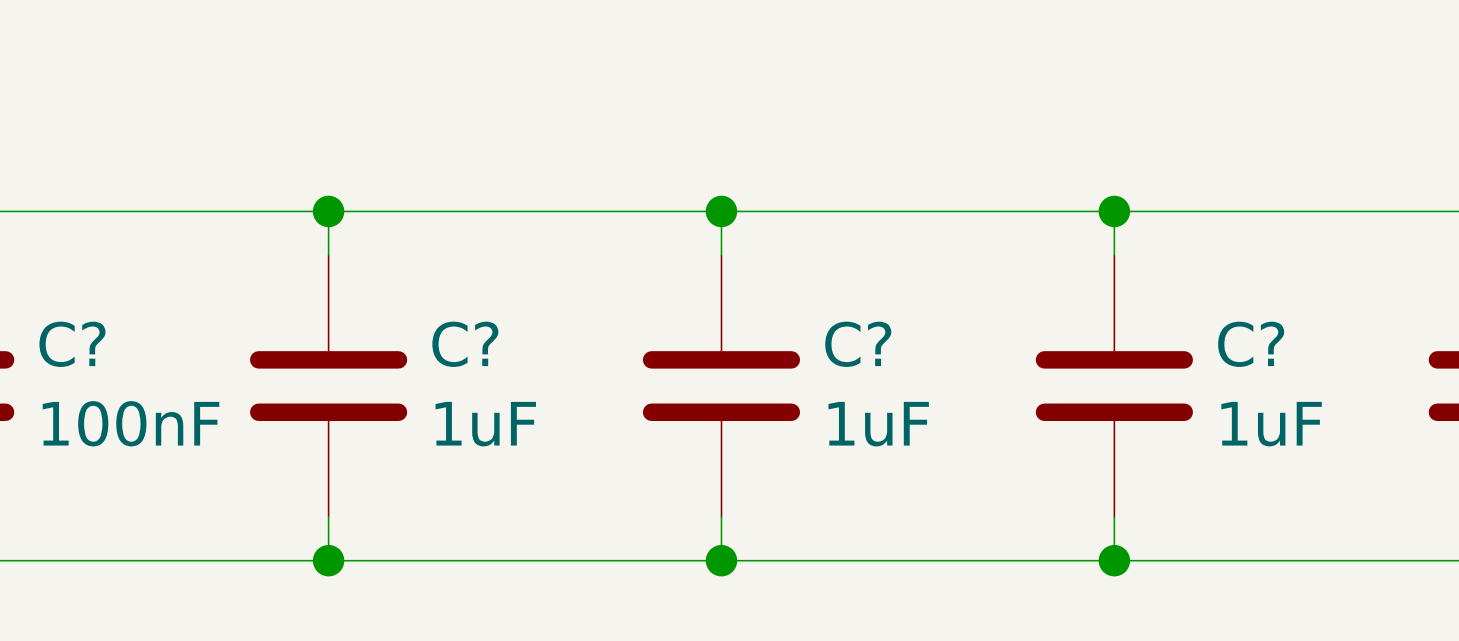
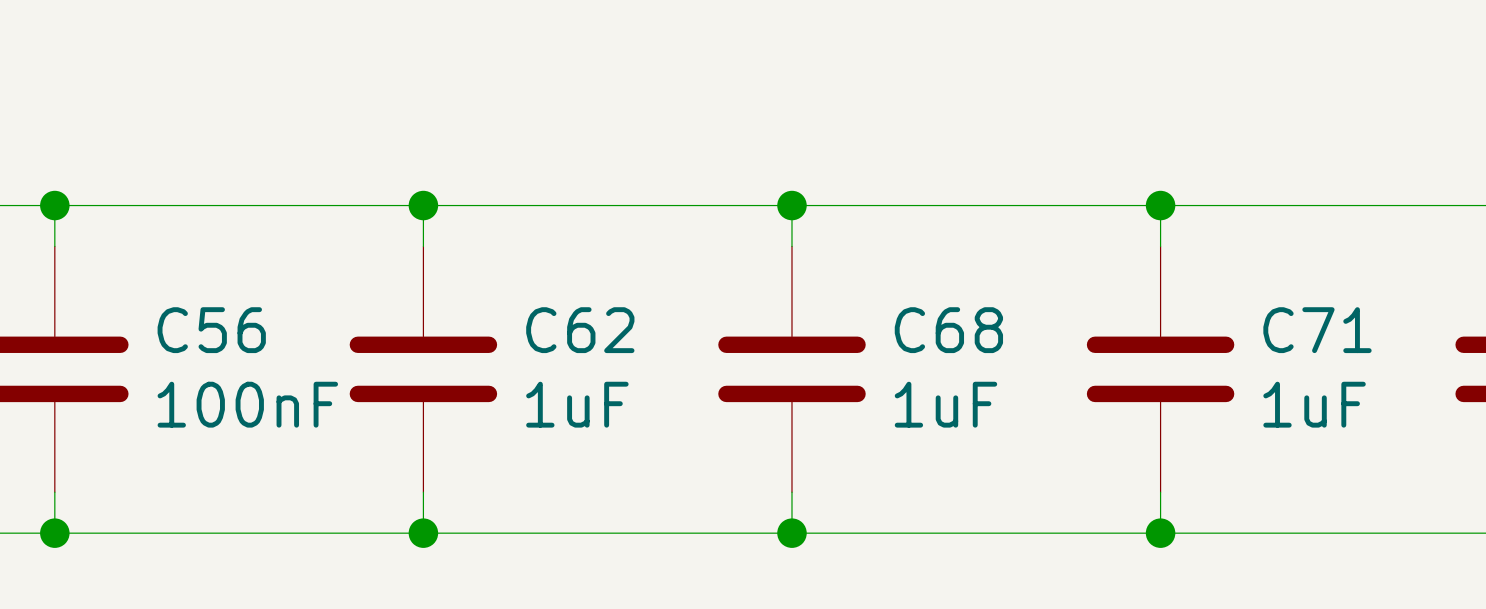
C? name: C? (72, 344) -> C56 (211, 330)
C? name: C? (465, 344) -> C62 (580, 330)
C? name: C? (858, 344) -> C68 (948, 330)
C? name: C? (1251, 344) -> C71 (1317, 330)

